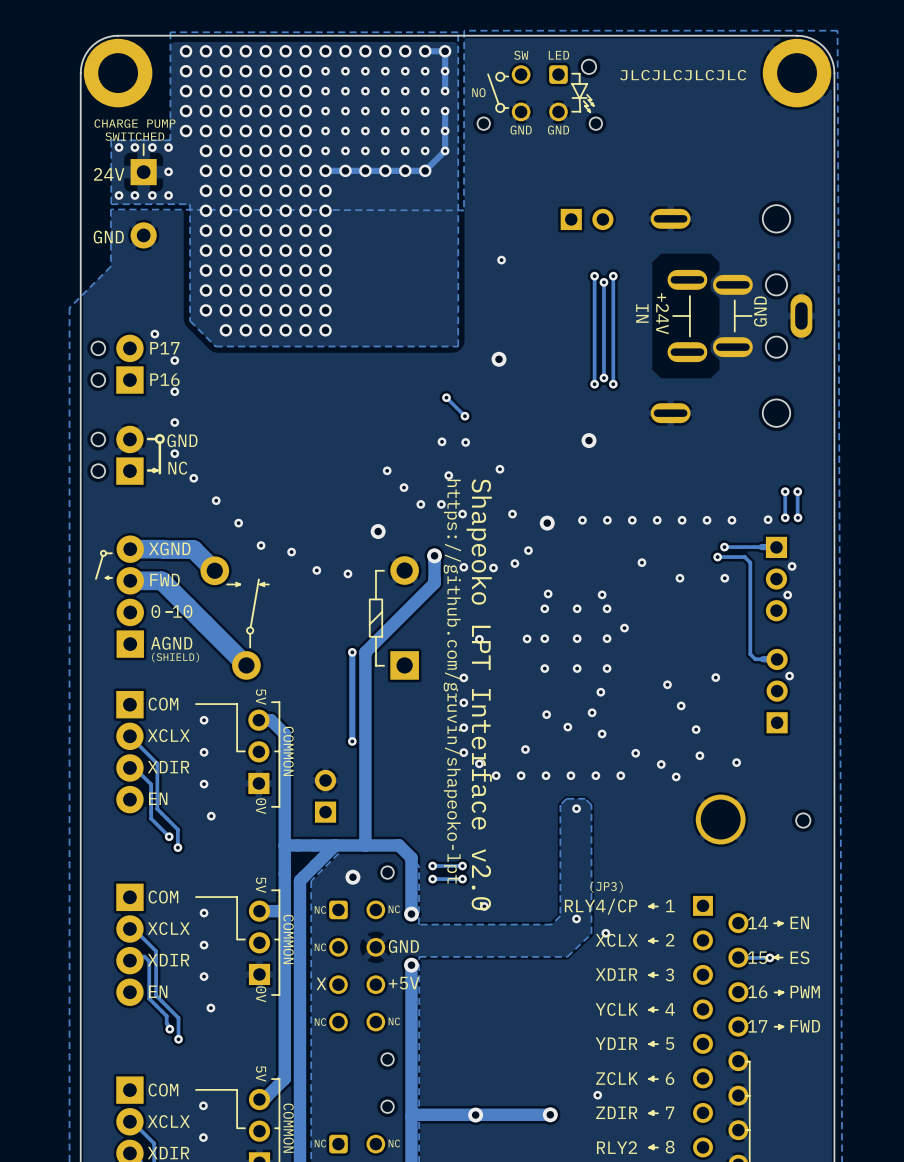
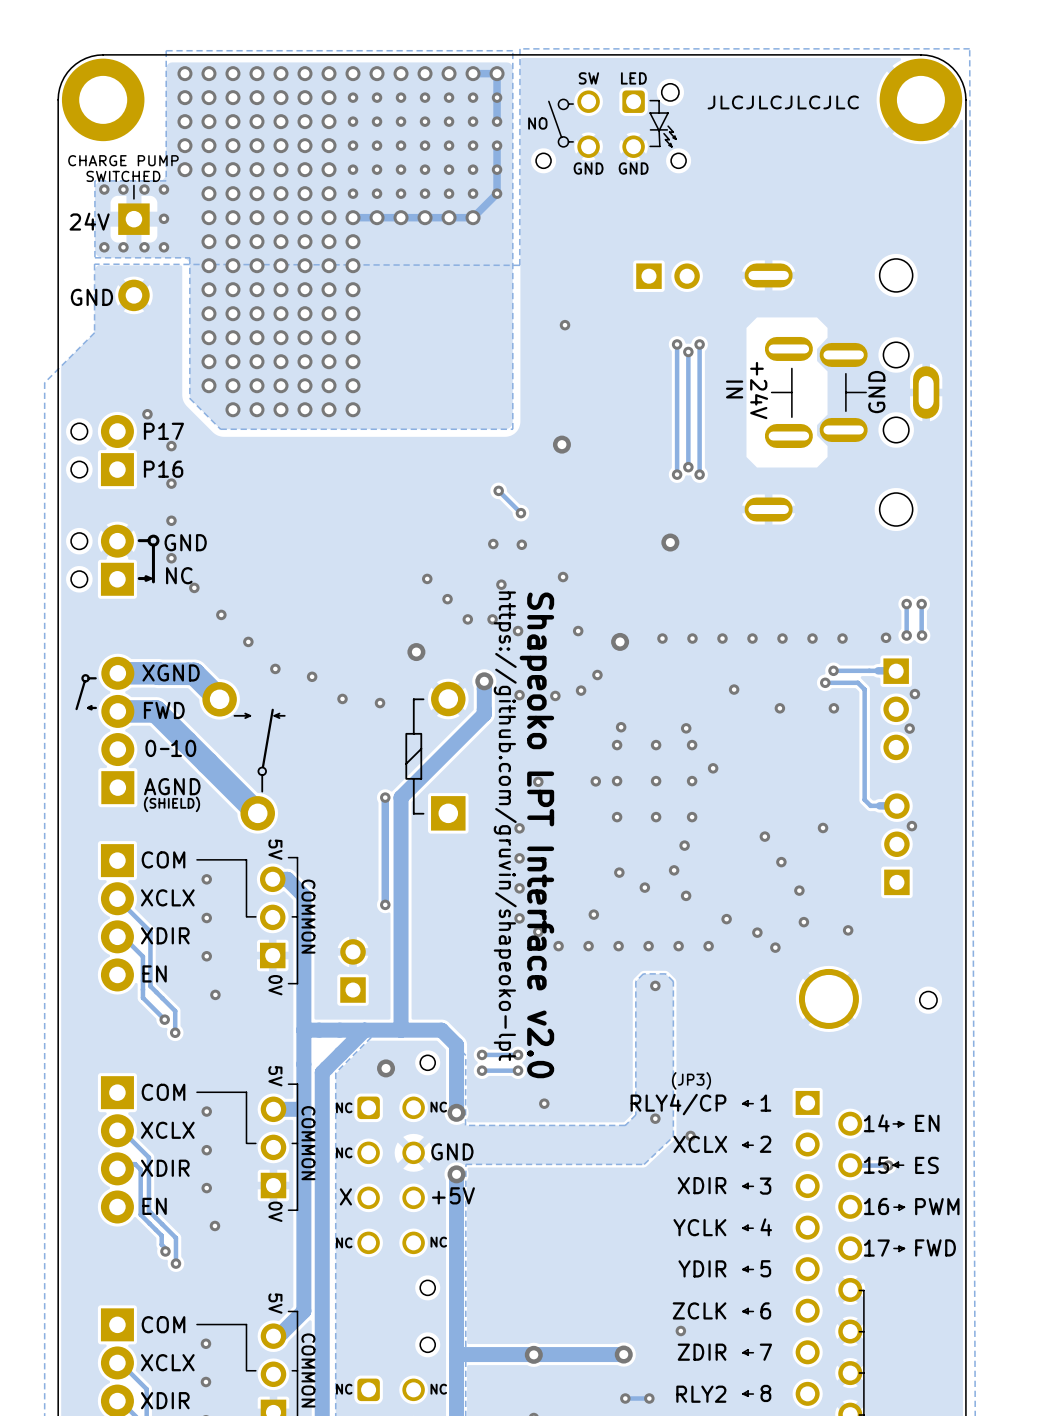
via: none -> (625, 1398)
track: none -> (649, 1398) (625, 1398)
via: none -> (649, 1398)

